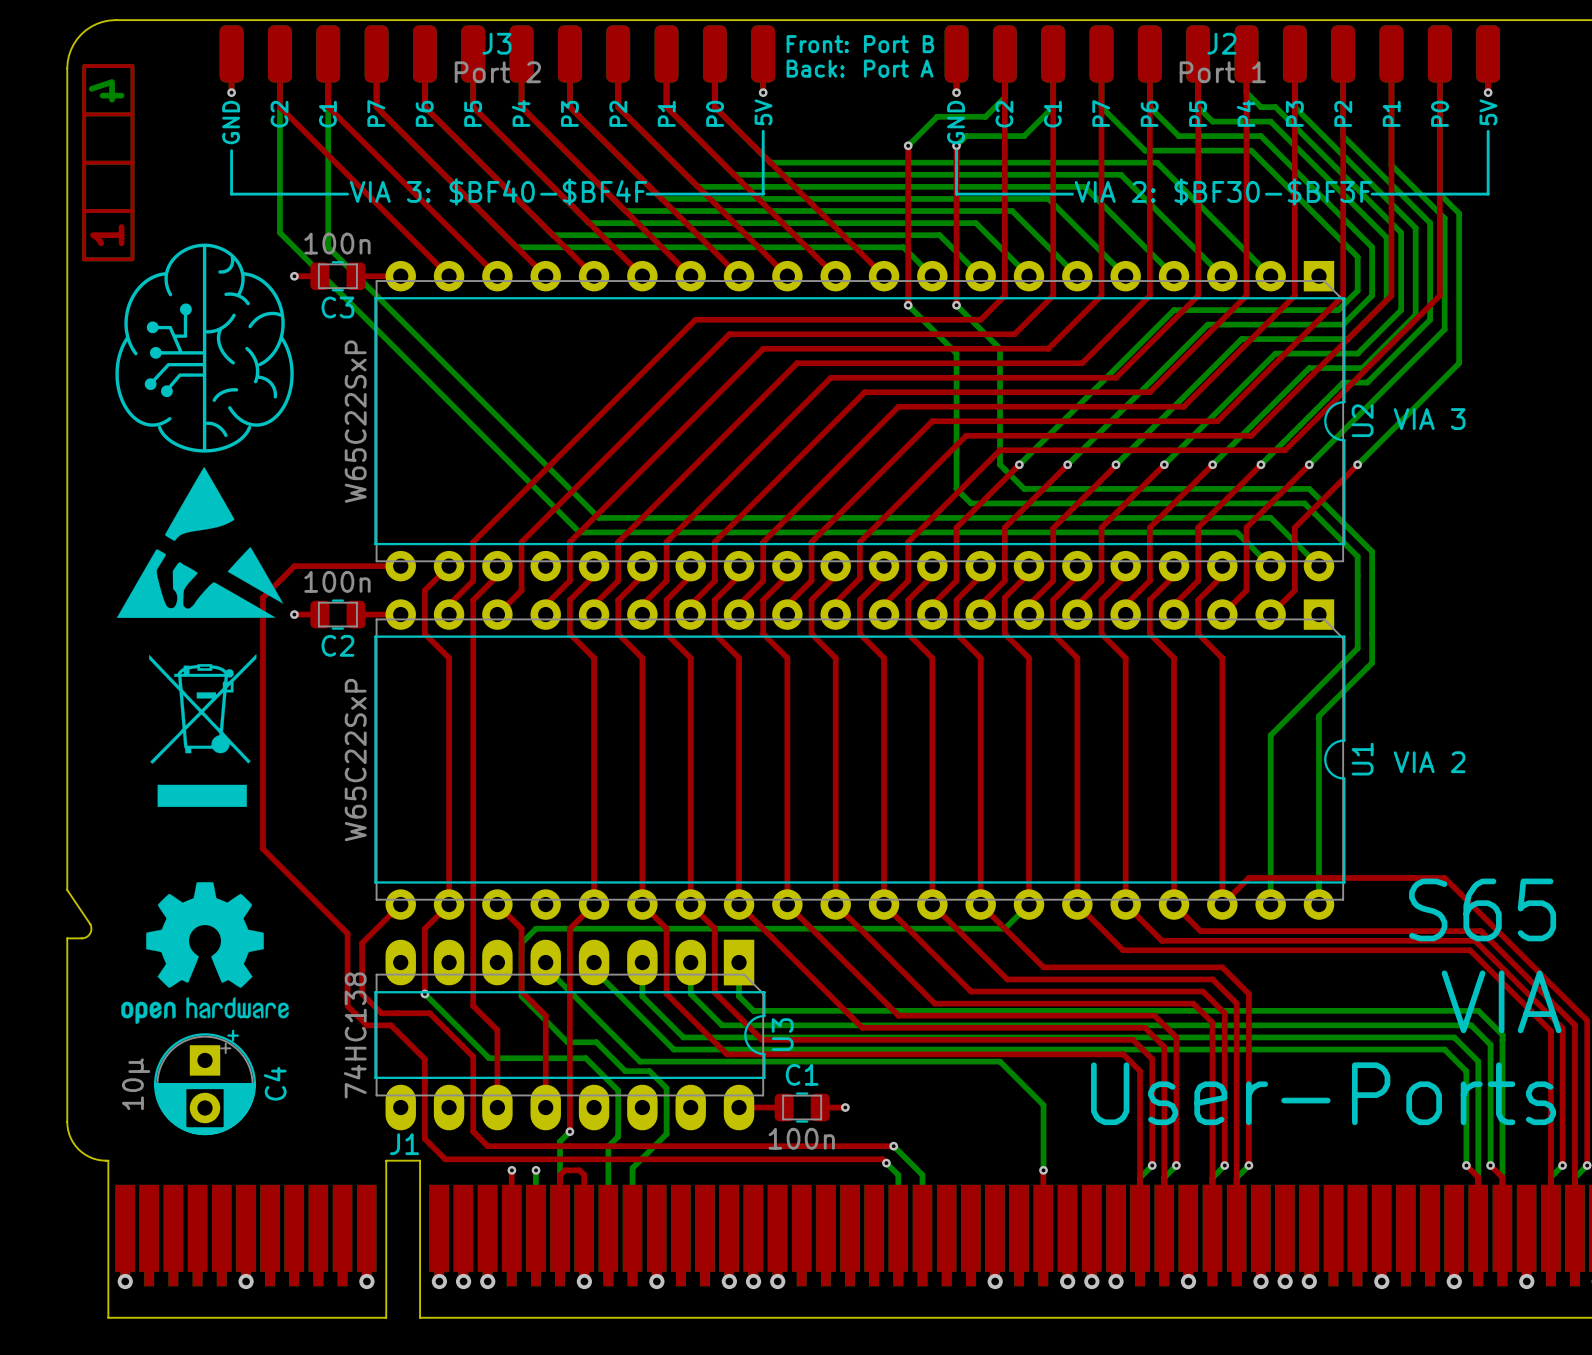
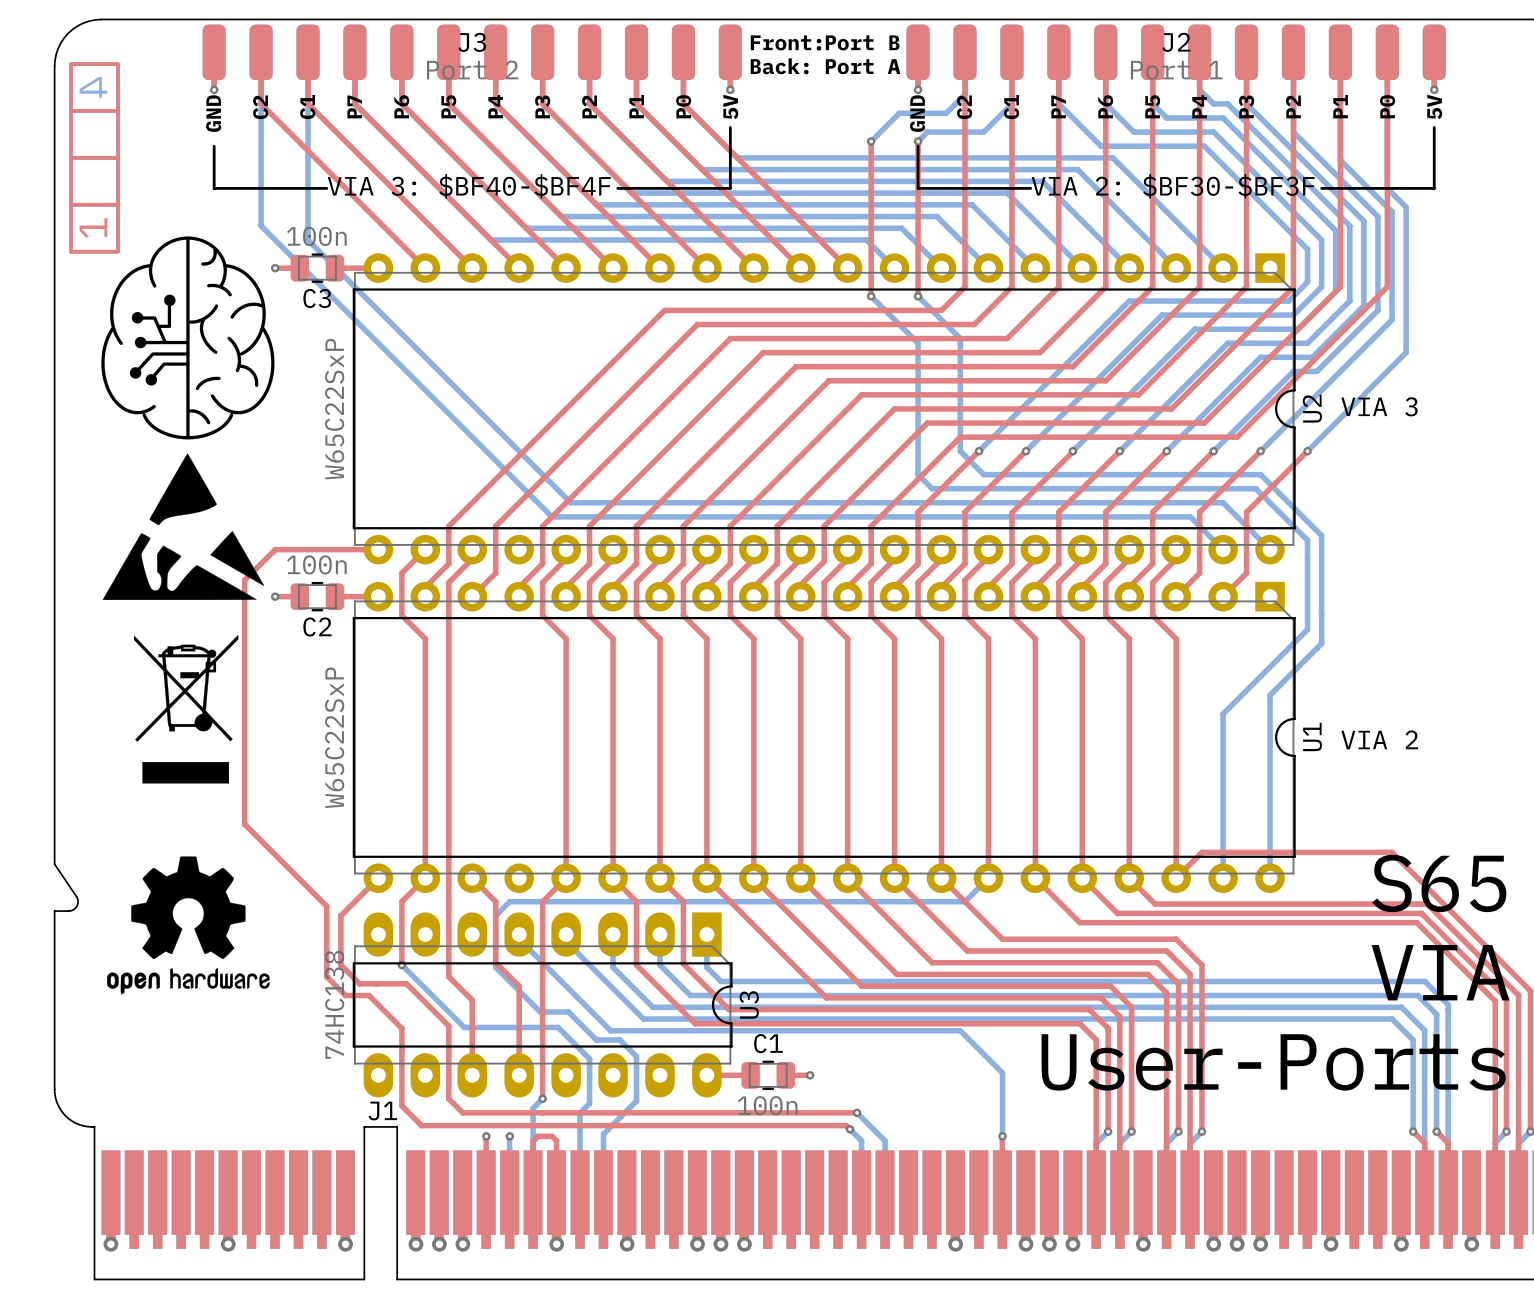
C4: 10µ (205, 1082) -> none

